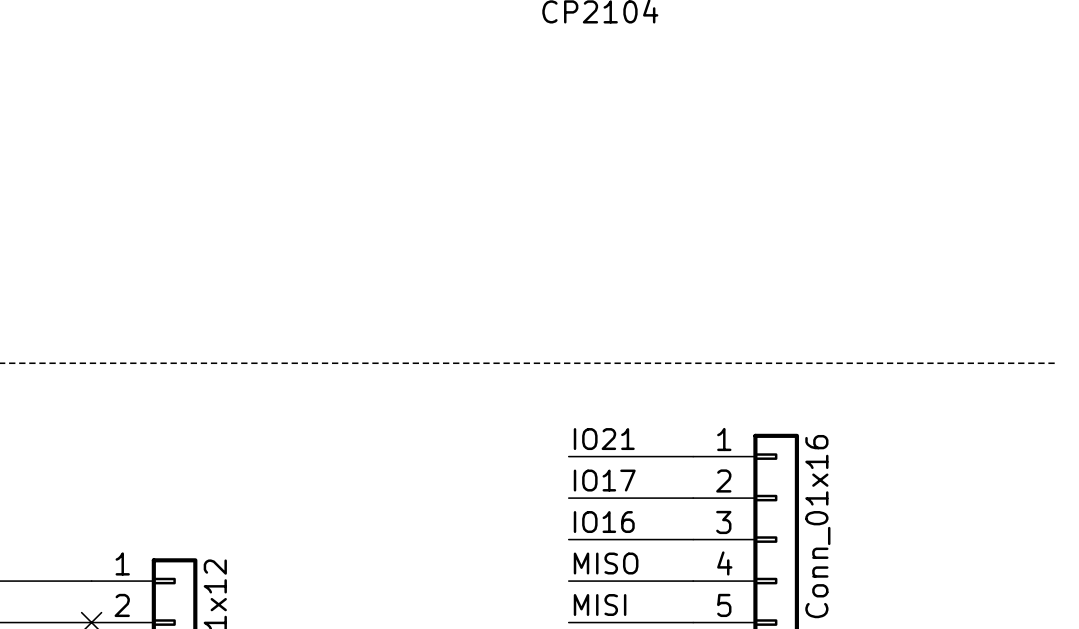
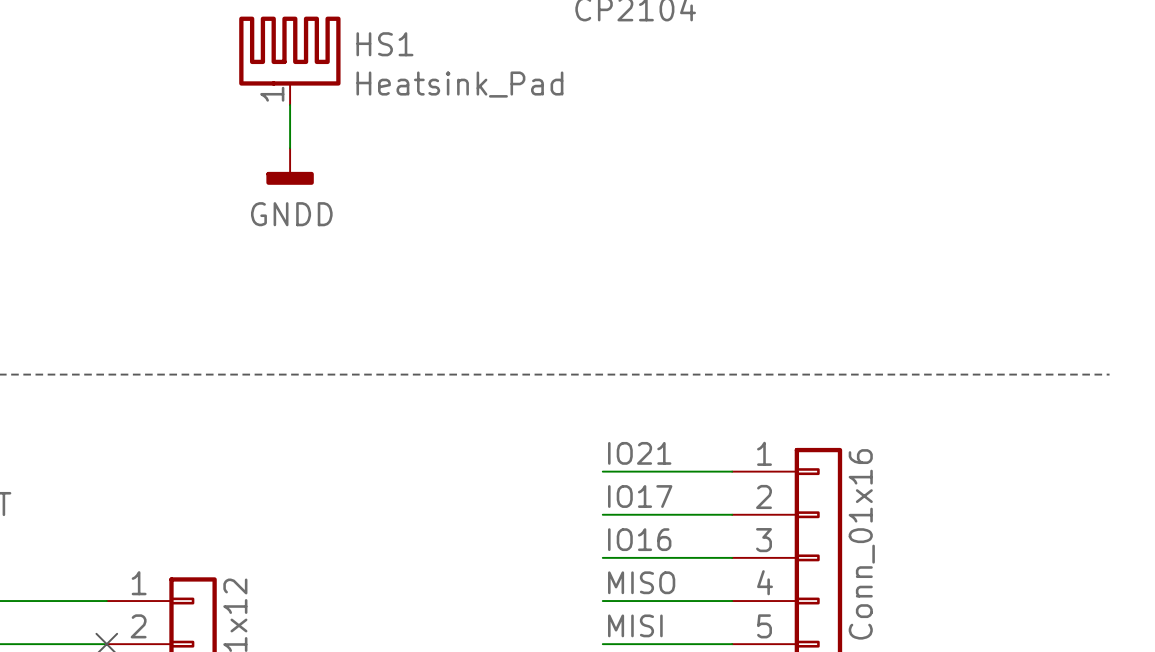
HS1: none -> Heatsink_Pad (289, 60)
wire: none -> (290, 105) (290, 148)
power symbol: none -> GNDD (290, 166)

